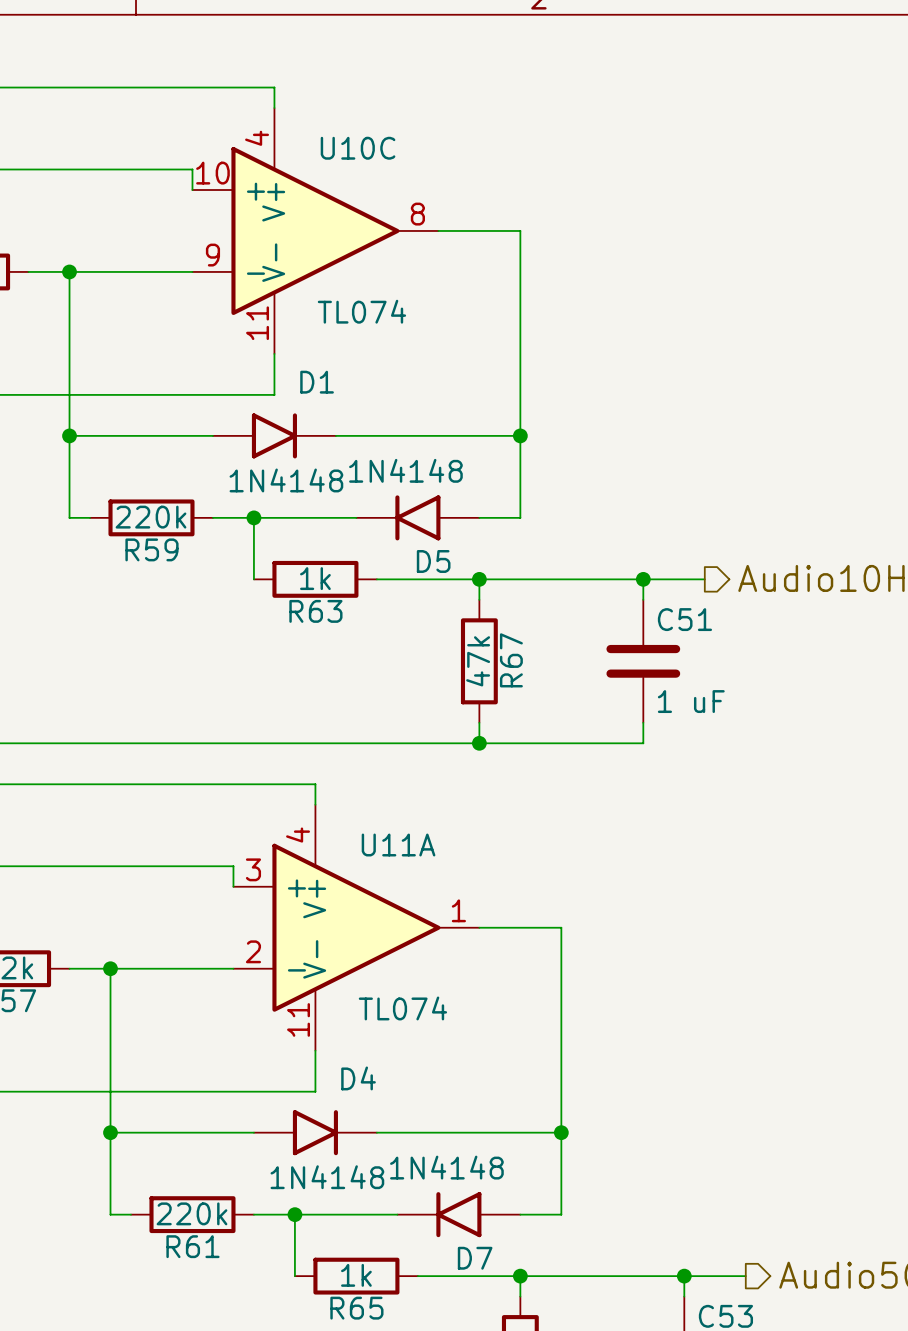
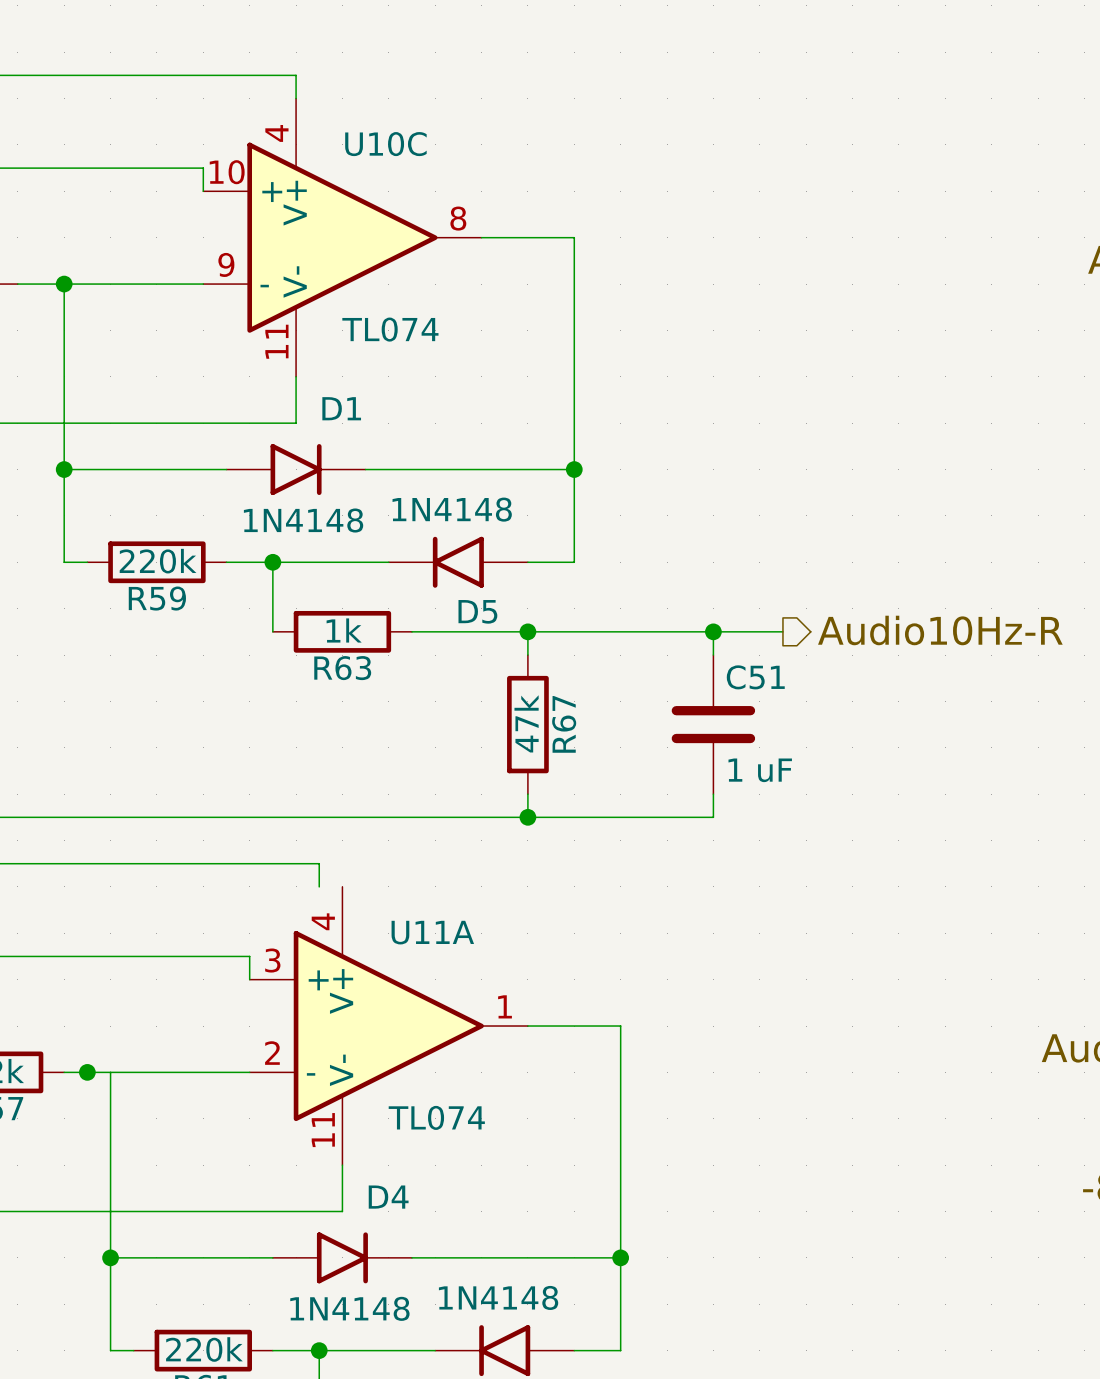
wire: (294, 784) (315, 784) (315, 804) -> (319, 863) (319, 886)
junction position: (110, 968) -> (87, 1072)

